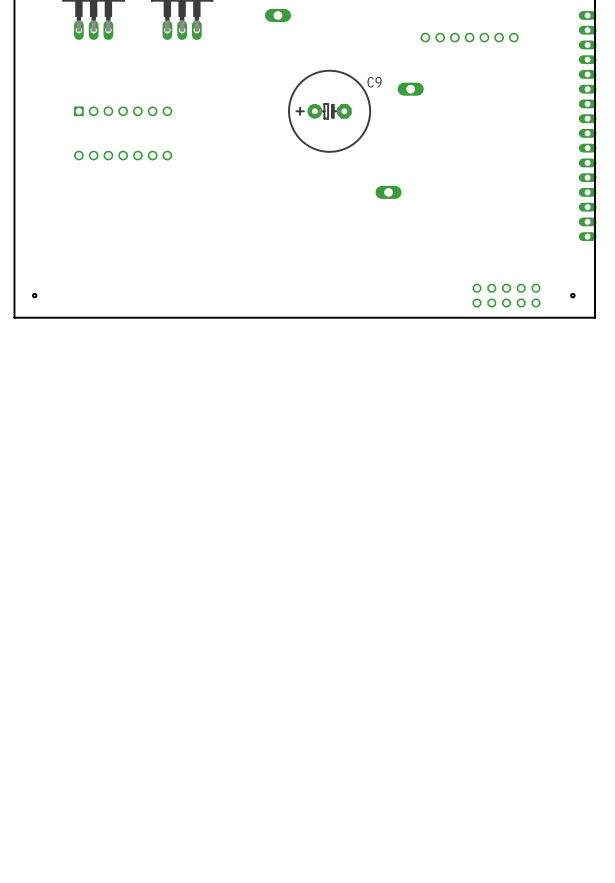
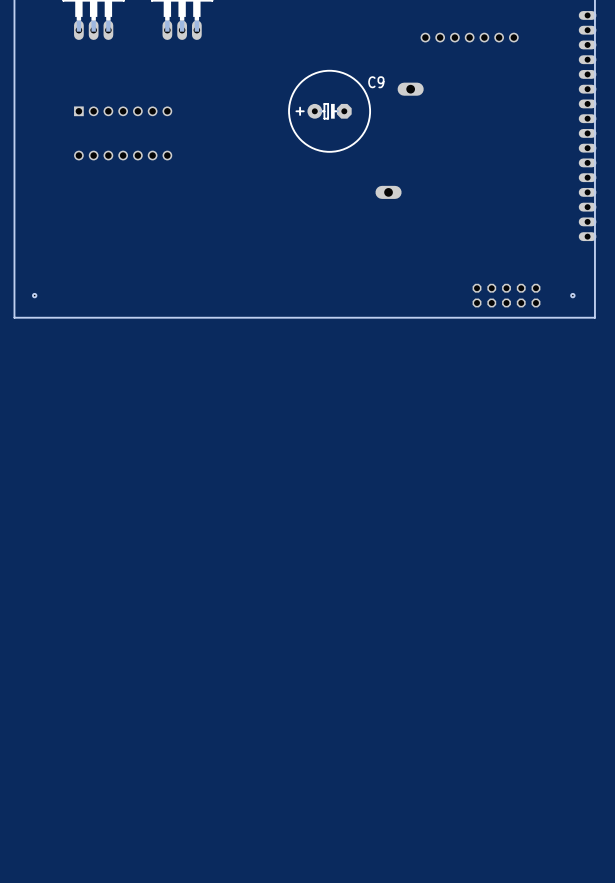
part: (277, 15) -> none

